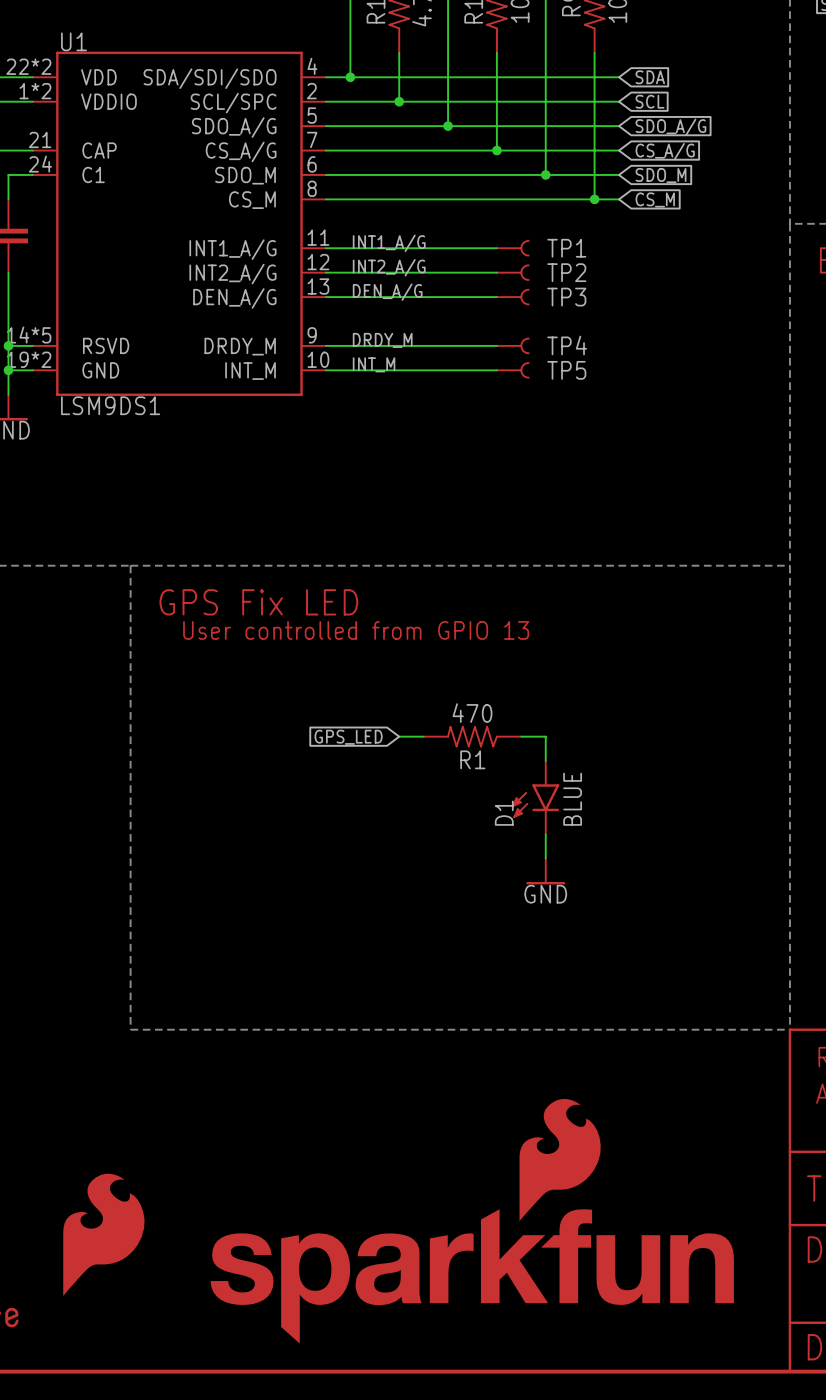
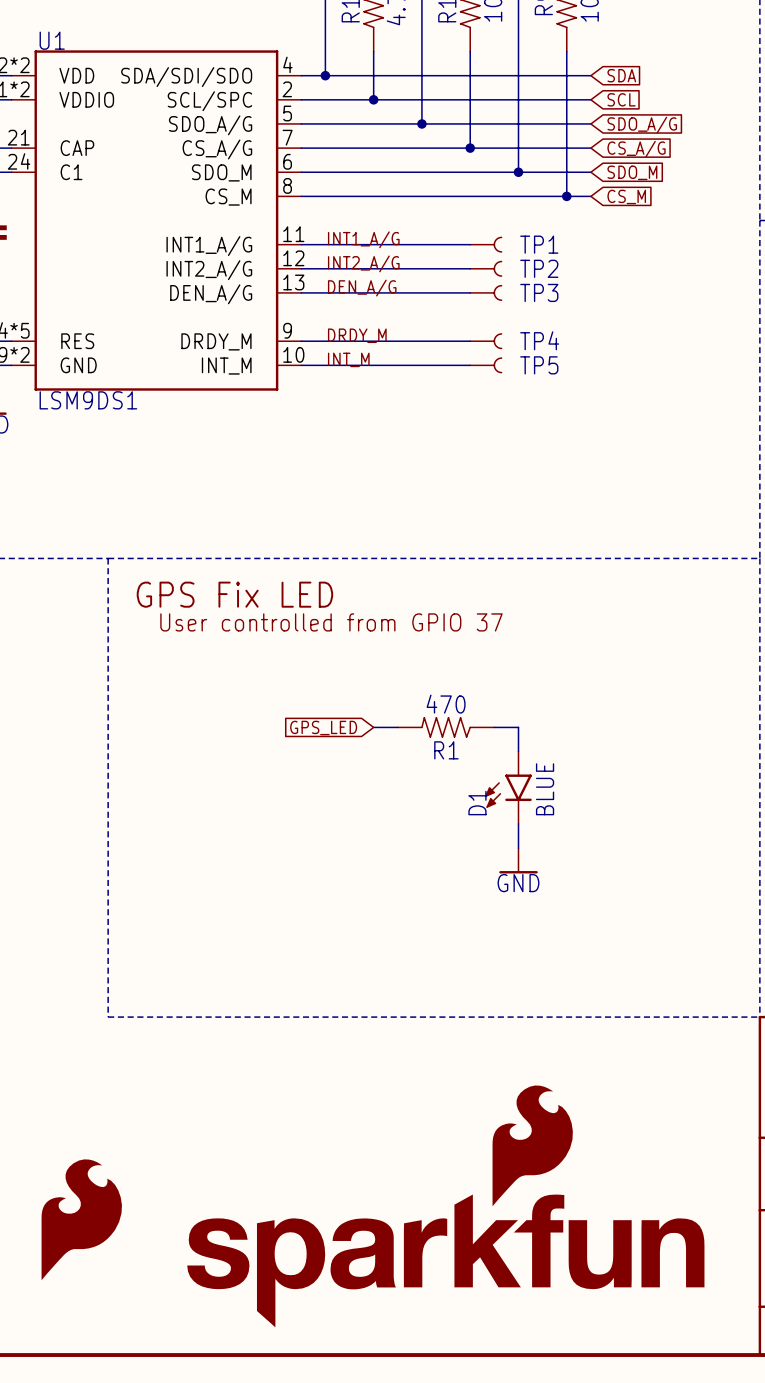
U1 pin name: RSVD (106, 345) -> RES (77, 341)
text: User controlled from GPIO 13 (356, 630) -> User controlled from GPIO 37 (331, 622)

